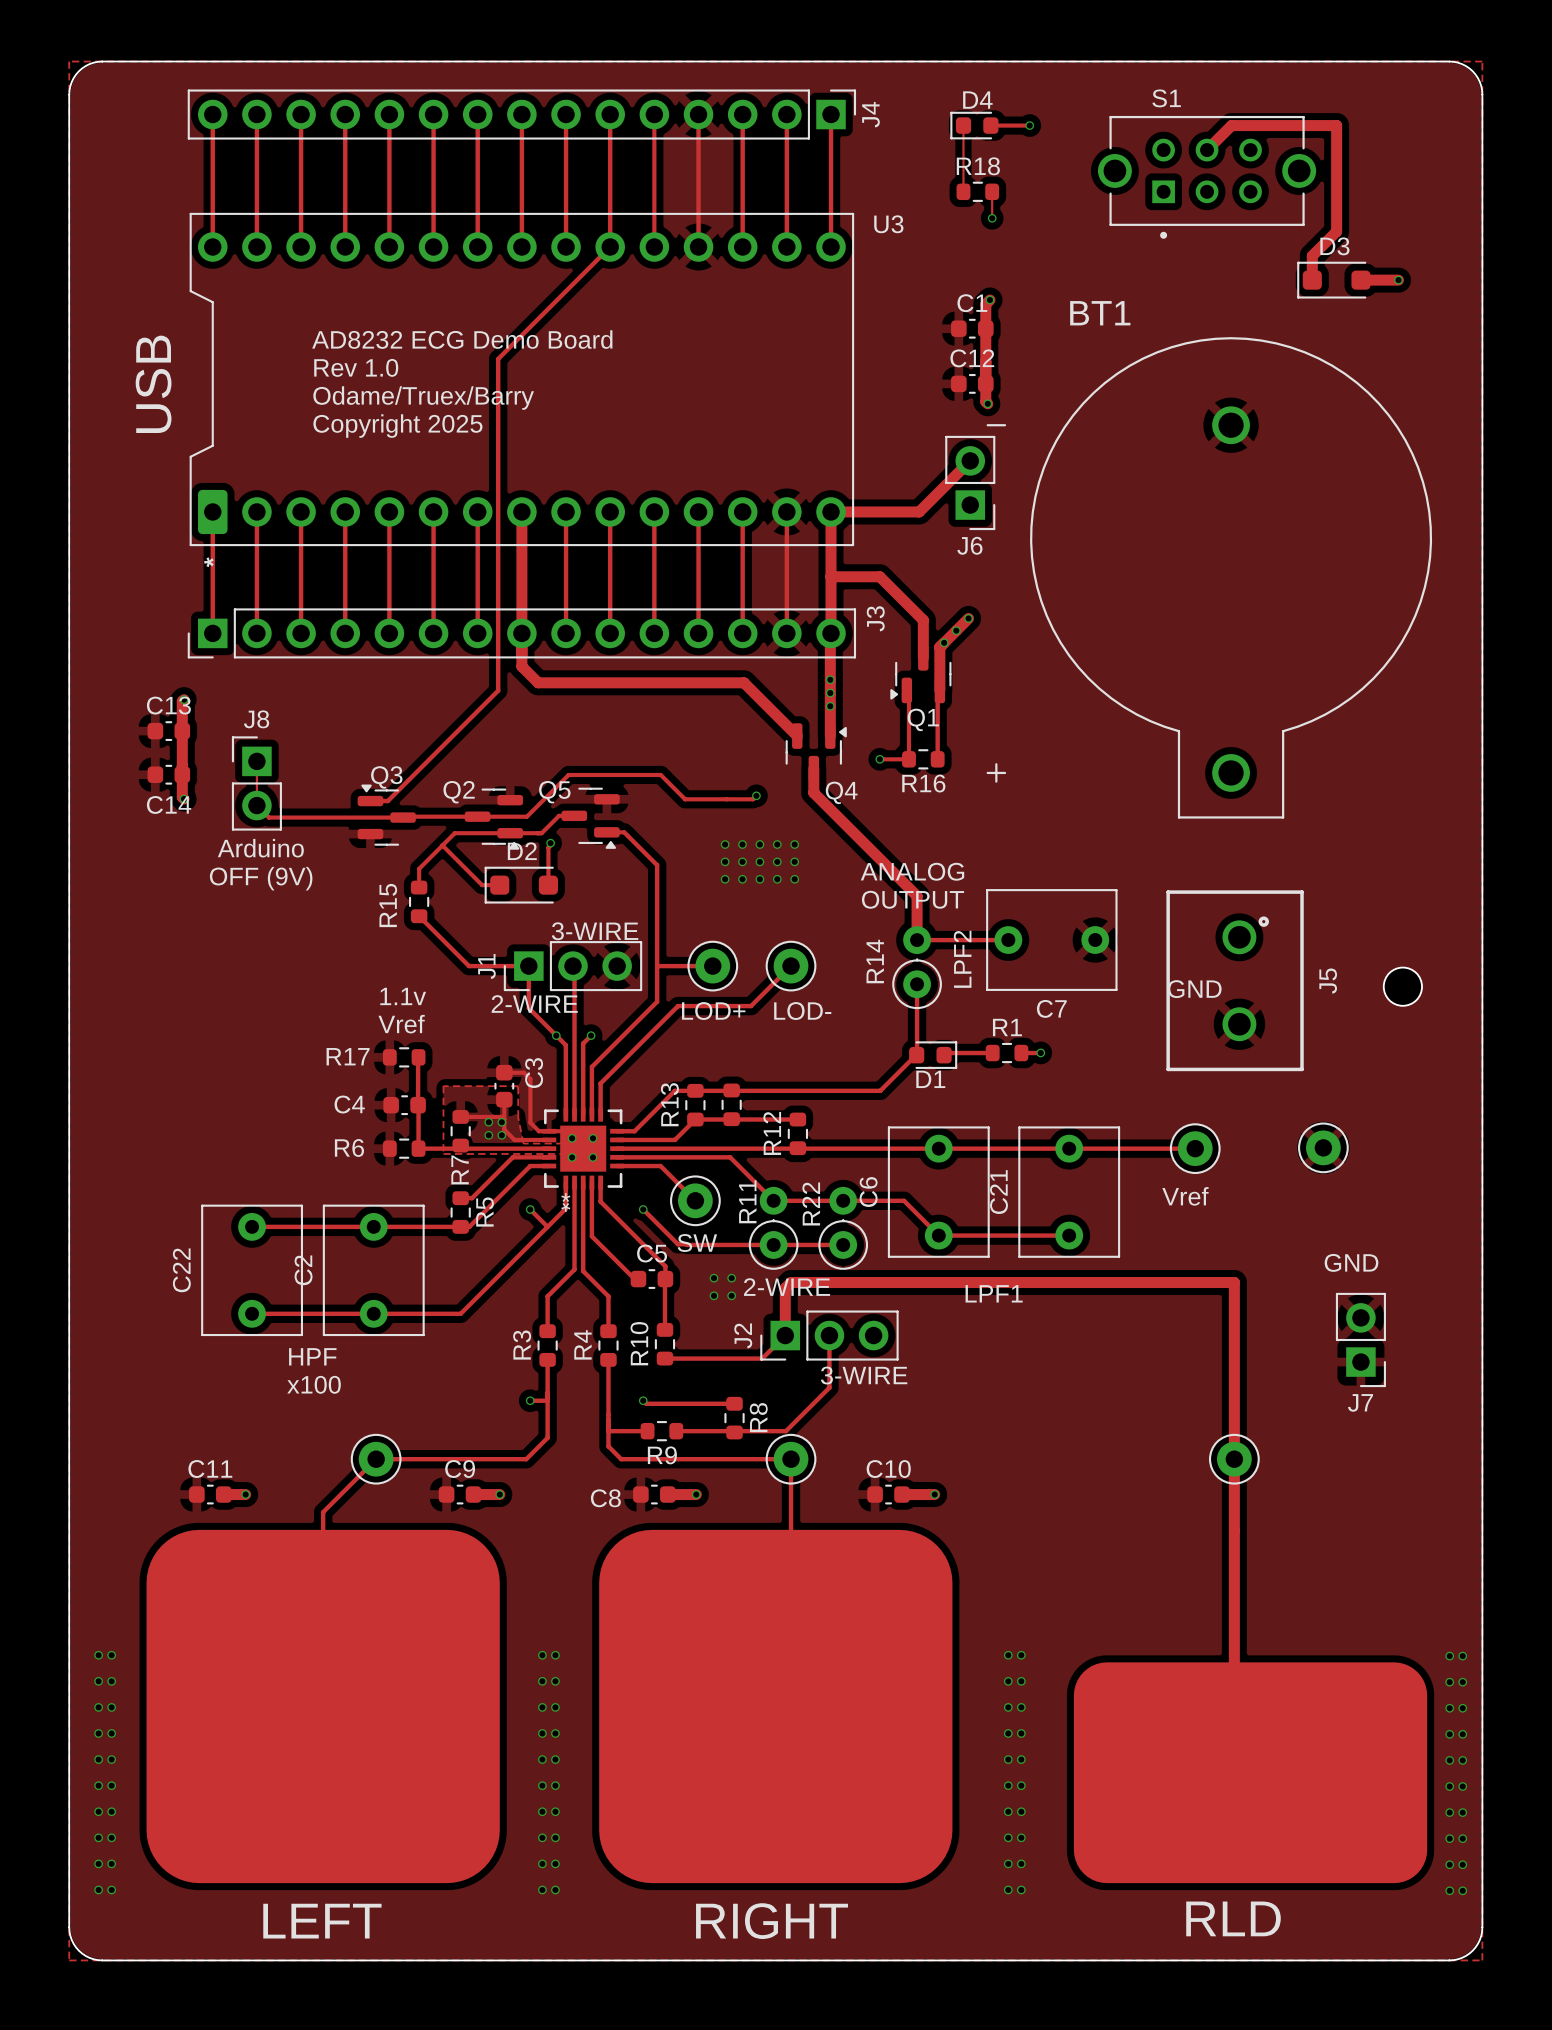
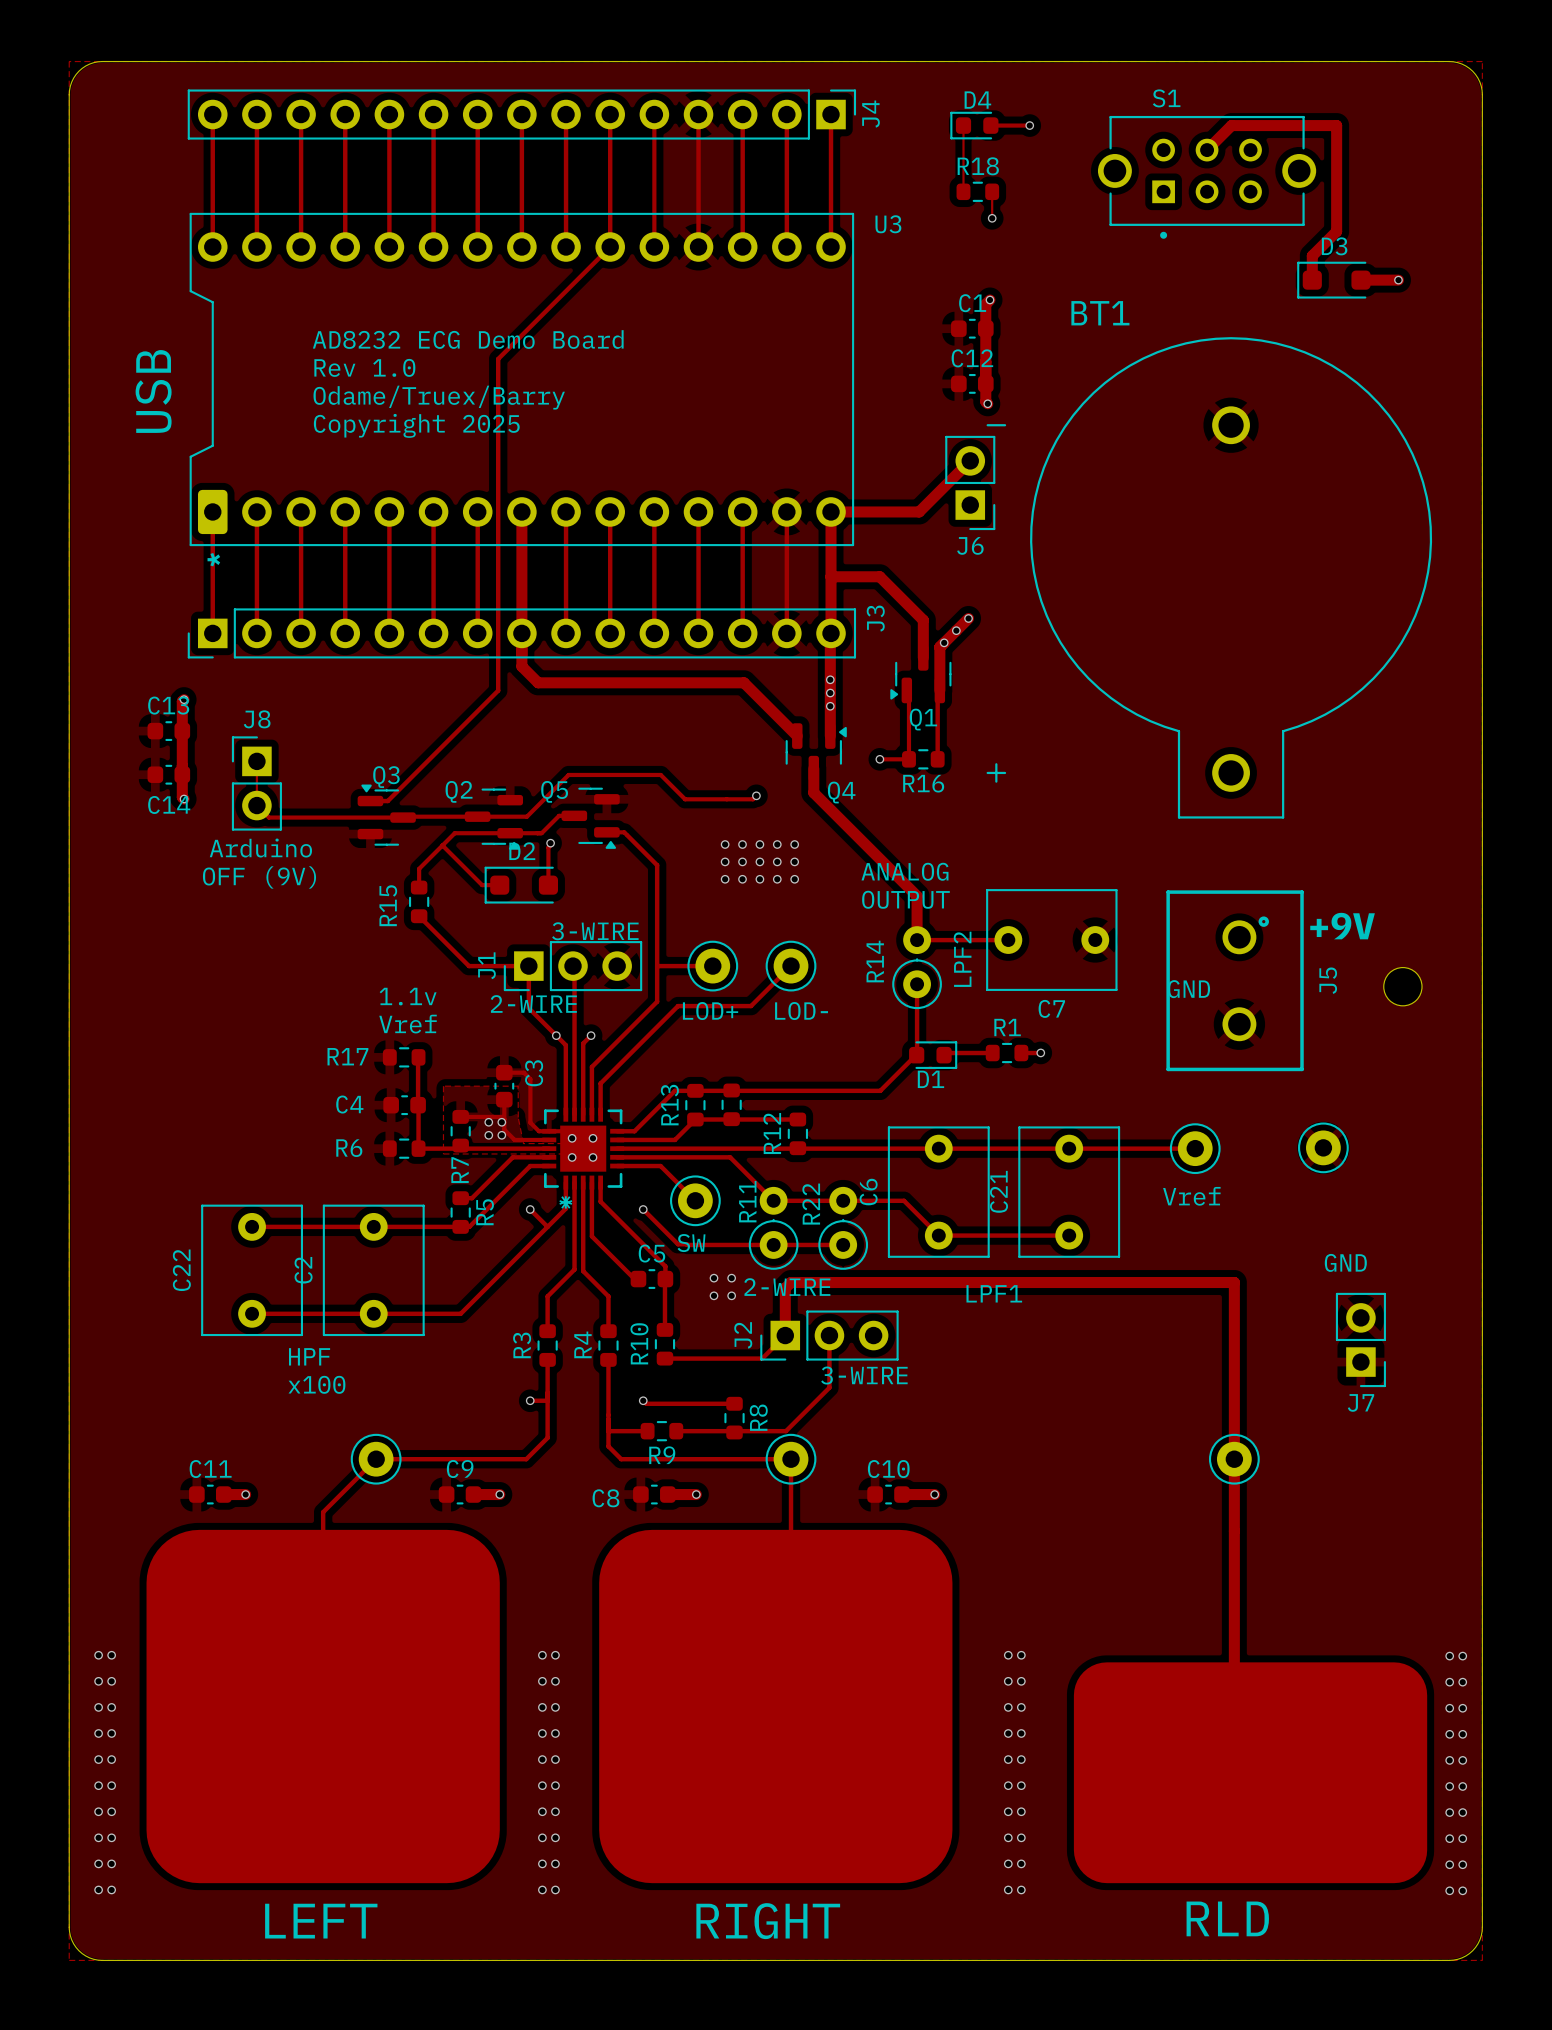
text: none -> +9V (1342, 926)

